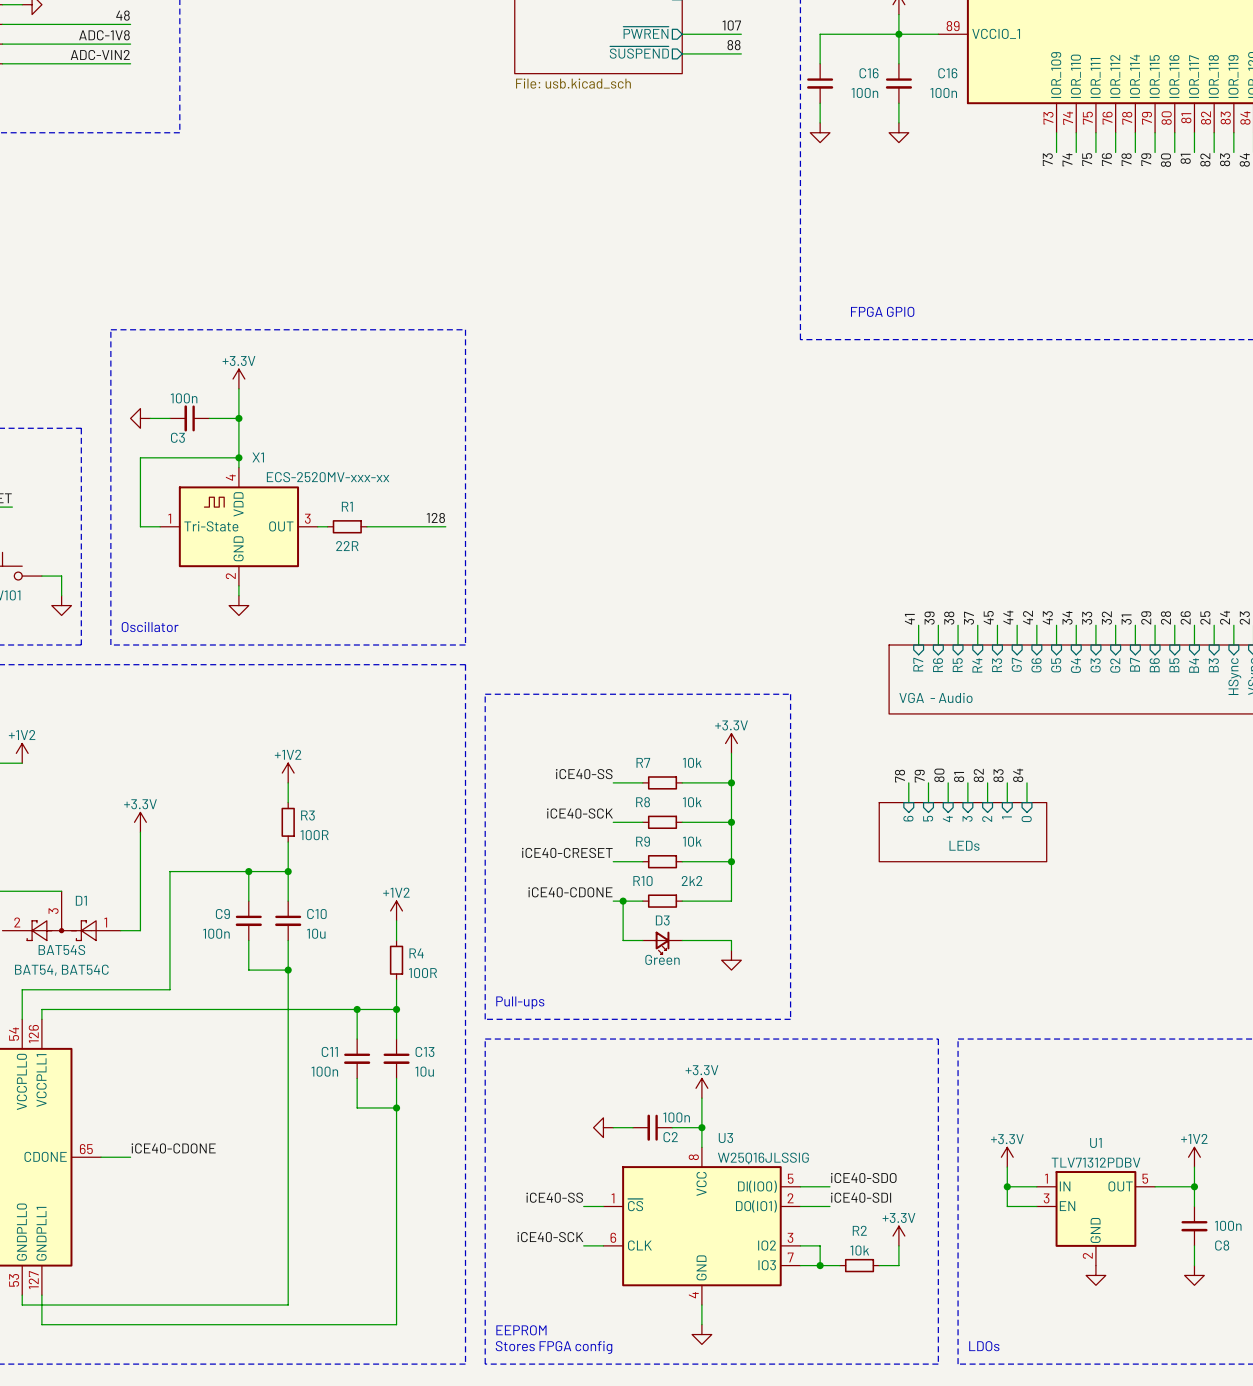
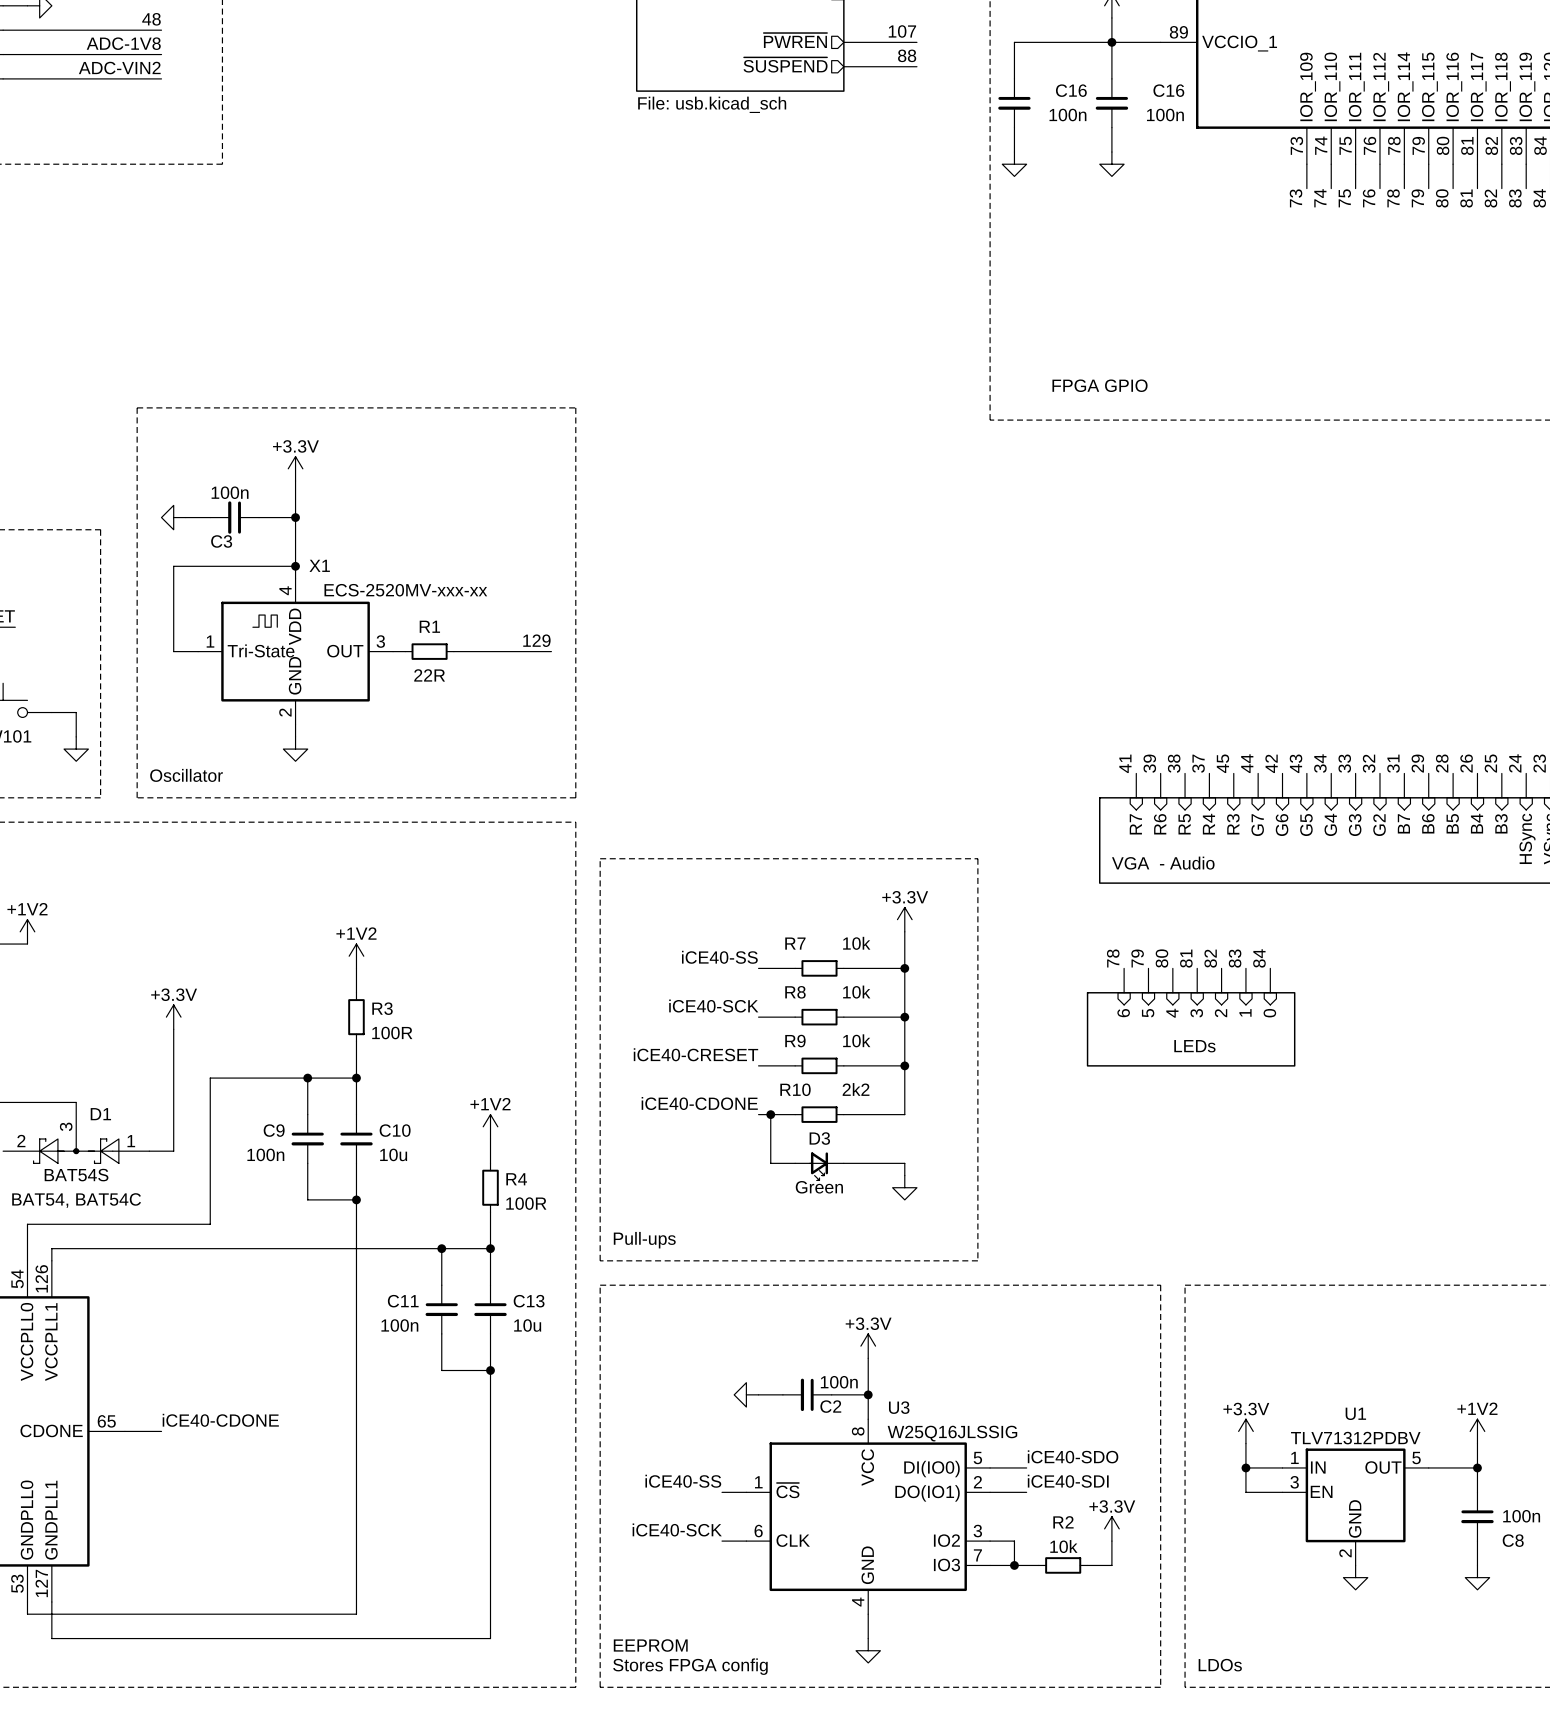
label: 128 (435, 517) -> 129 (536, 640)

